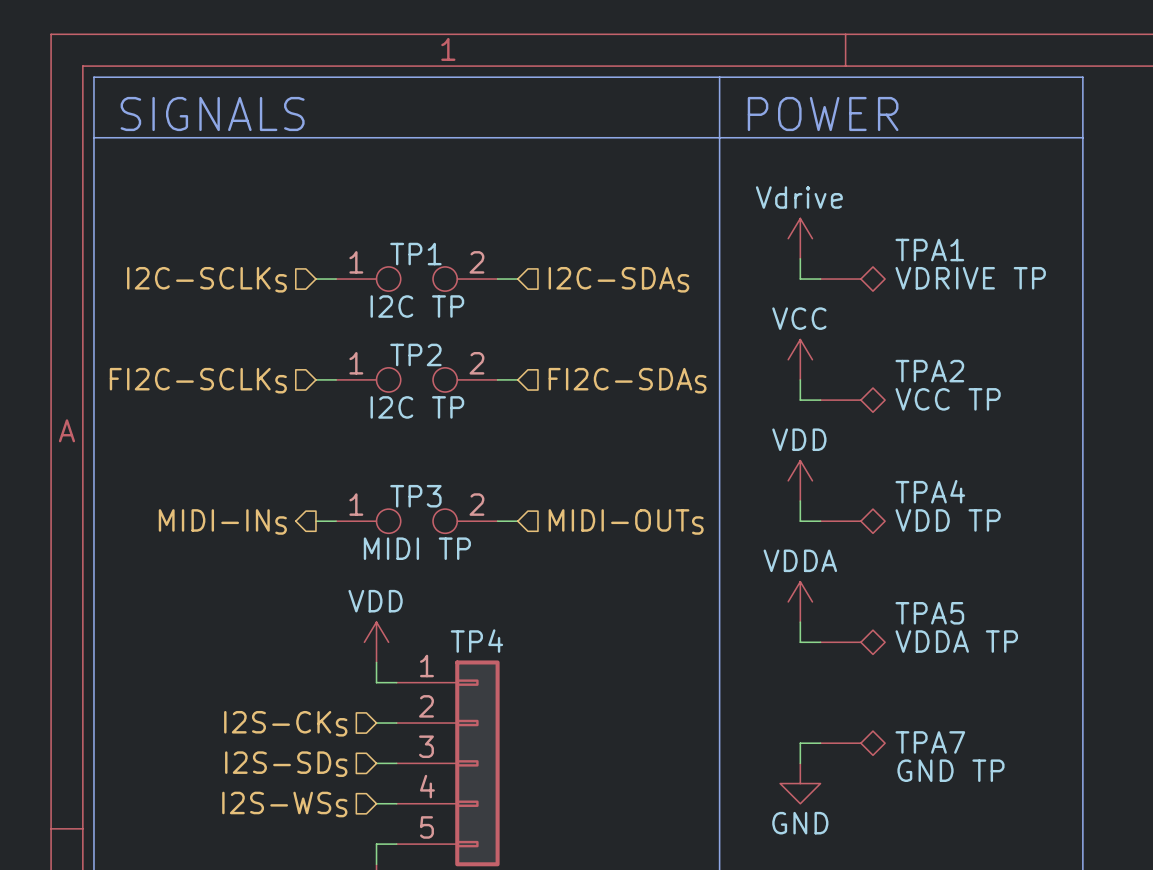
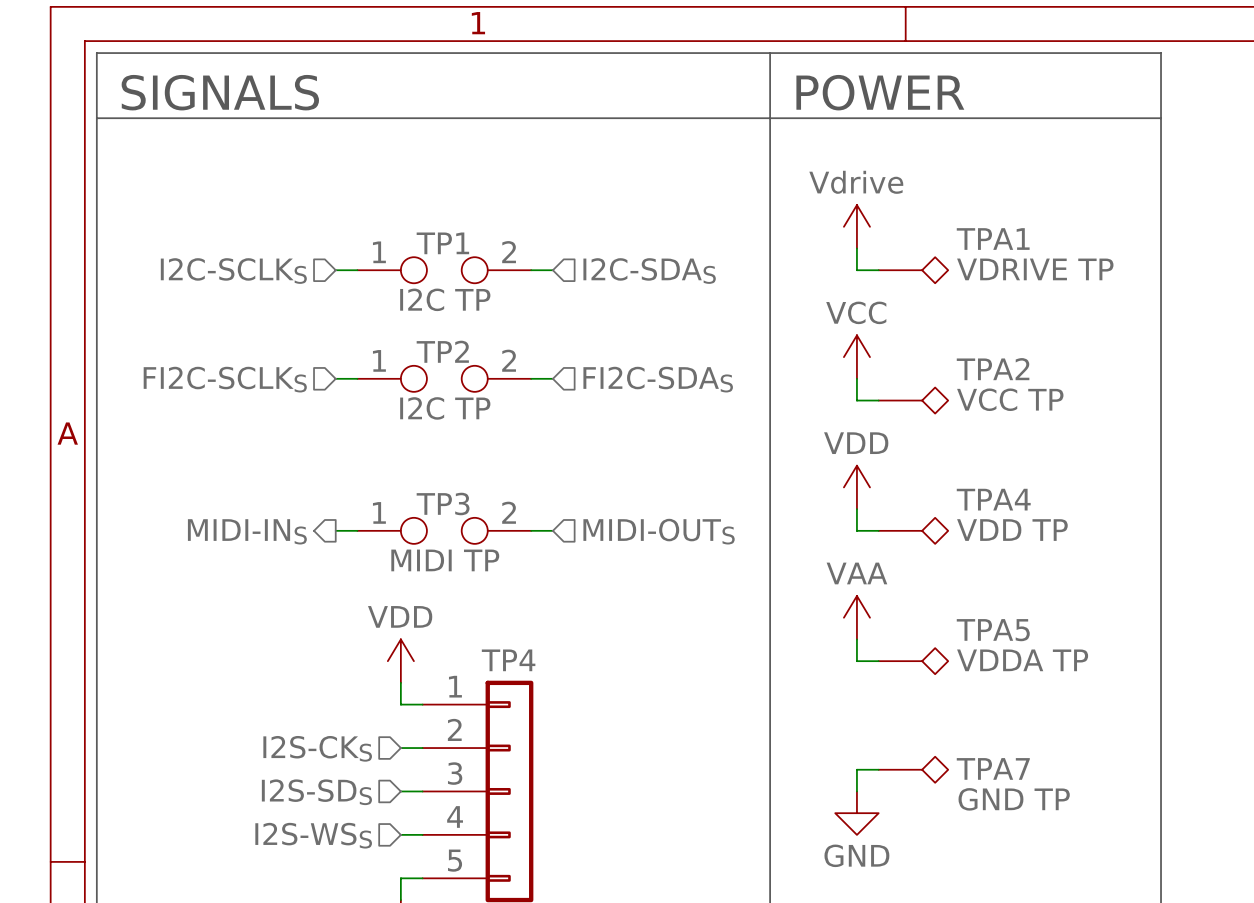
power symbol: VDDA (800, 601) -> VAA (856, 617)

